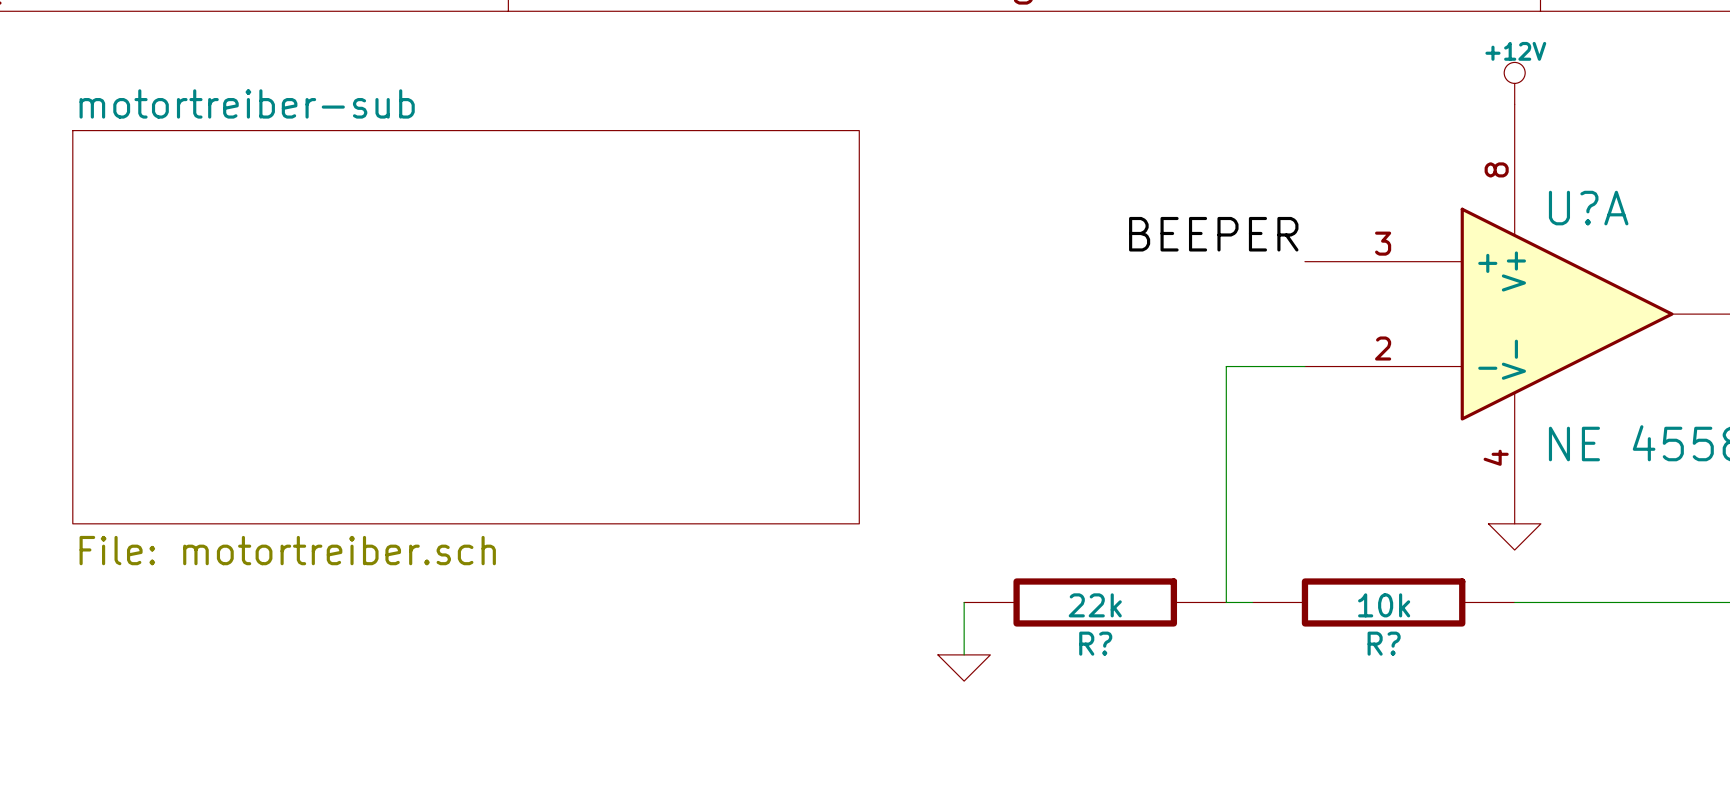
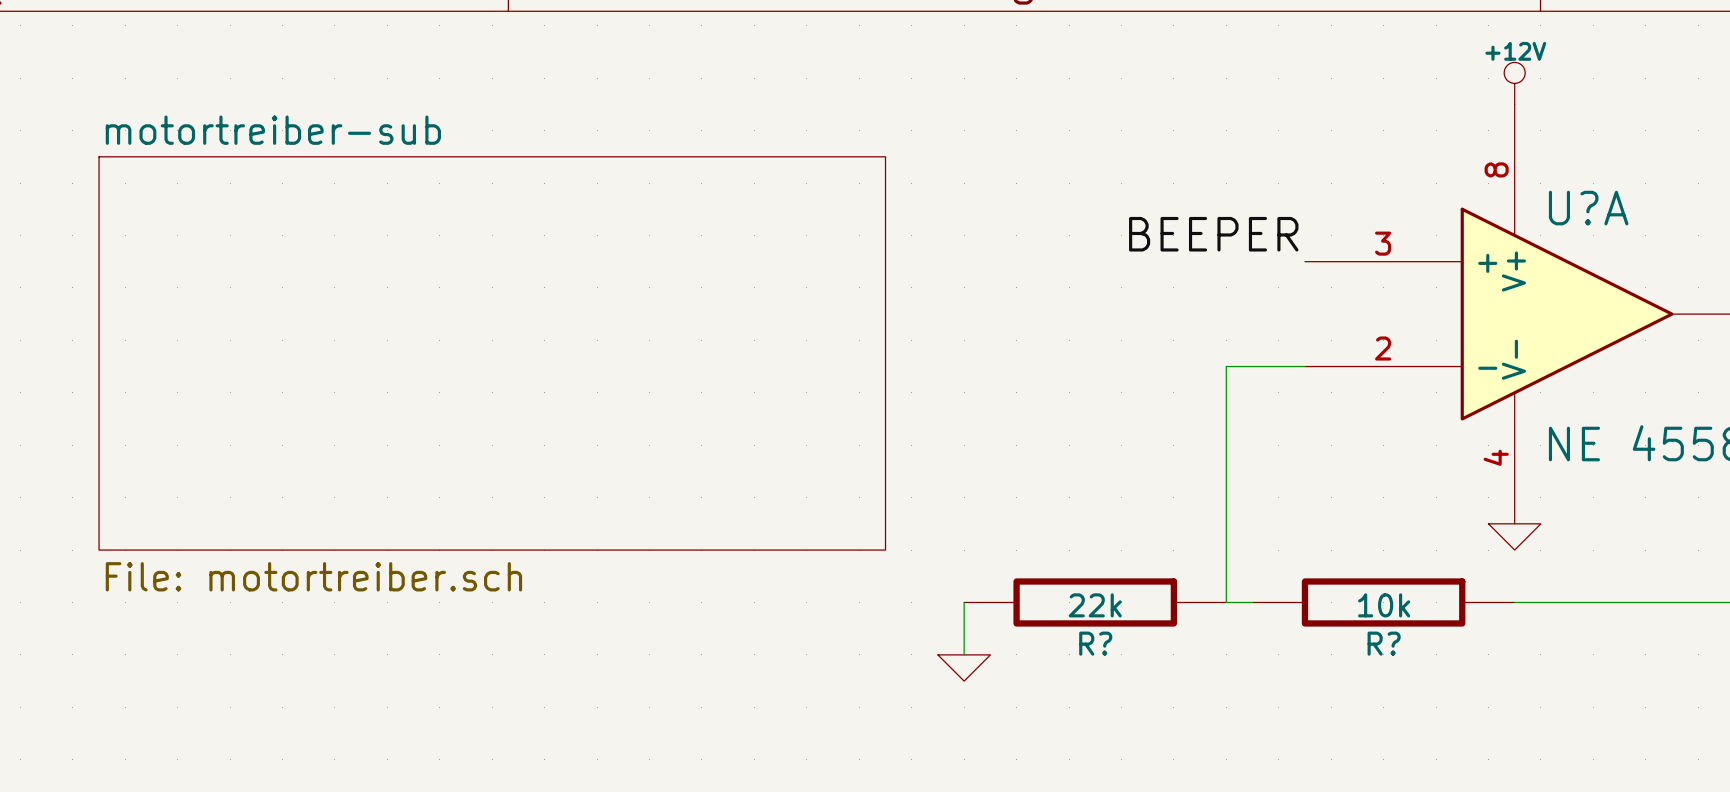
sheet motortreiber-sub position: (466, 327) -> (492, 353)

